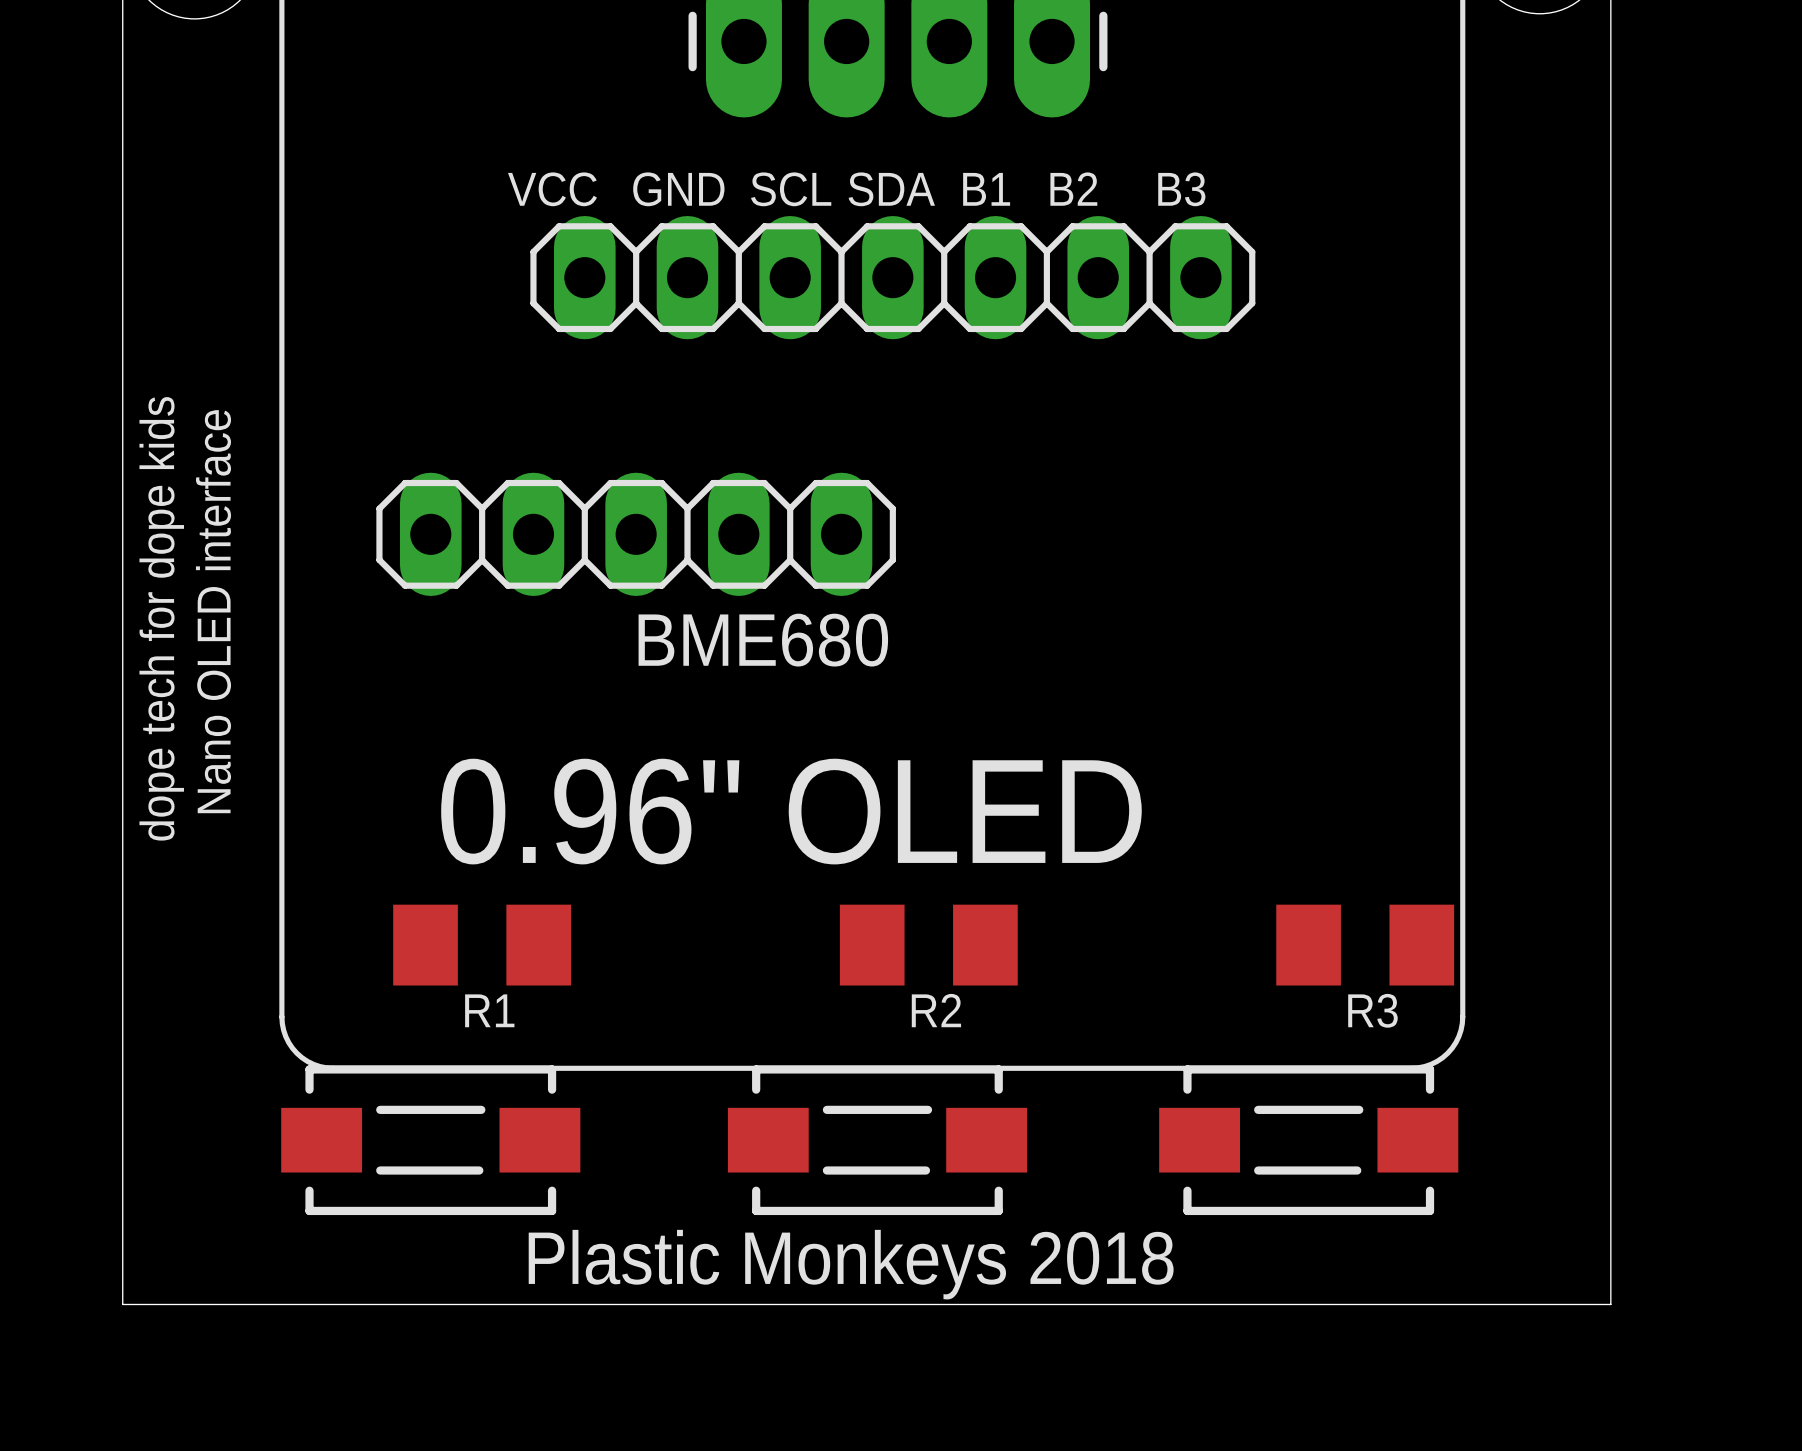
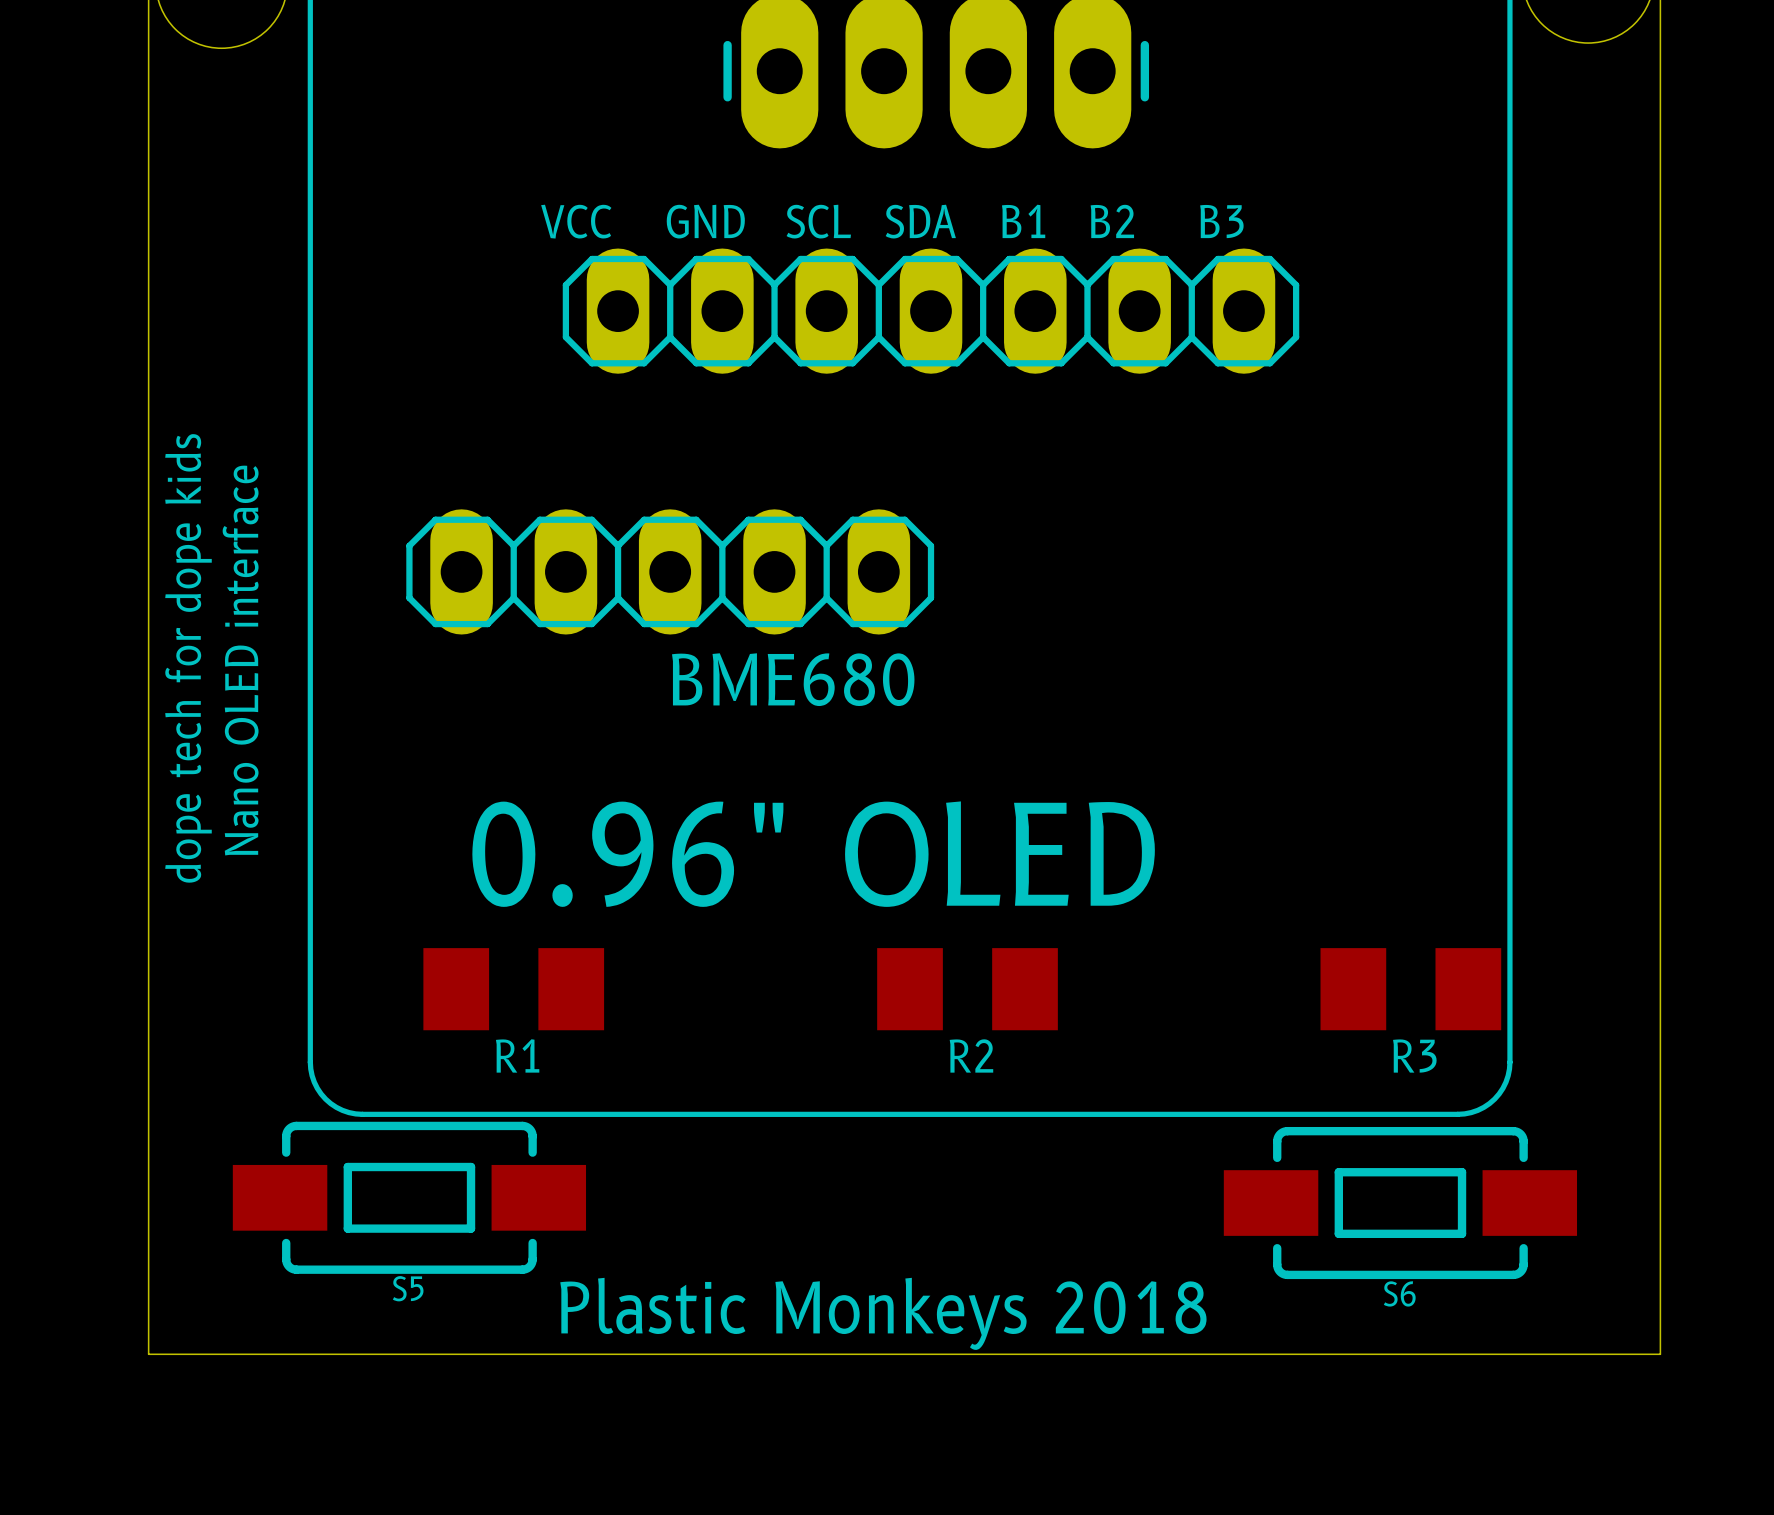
part: (430, 1140) -> none
part: (877, 1140) -> none
part: (1308, 1140) -> none
S5: none -> (409, 1197)
S6: none -> (1400, 1203)

